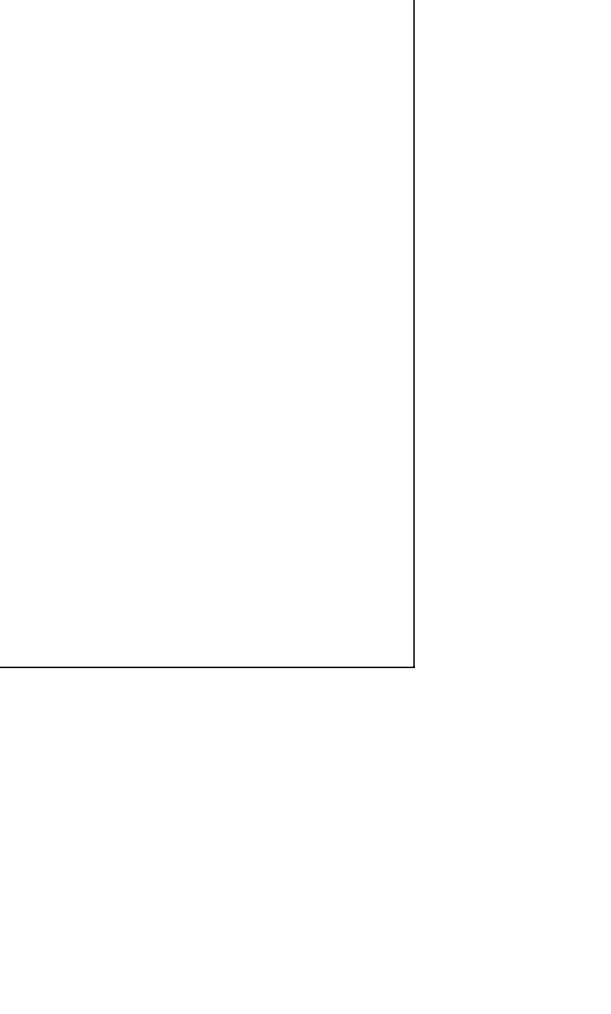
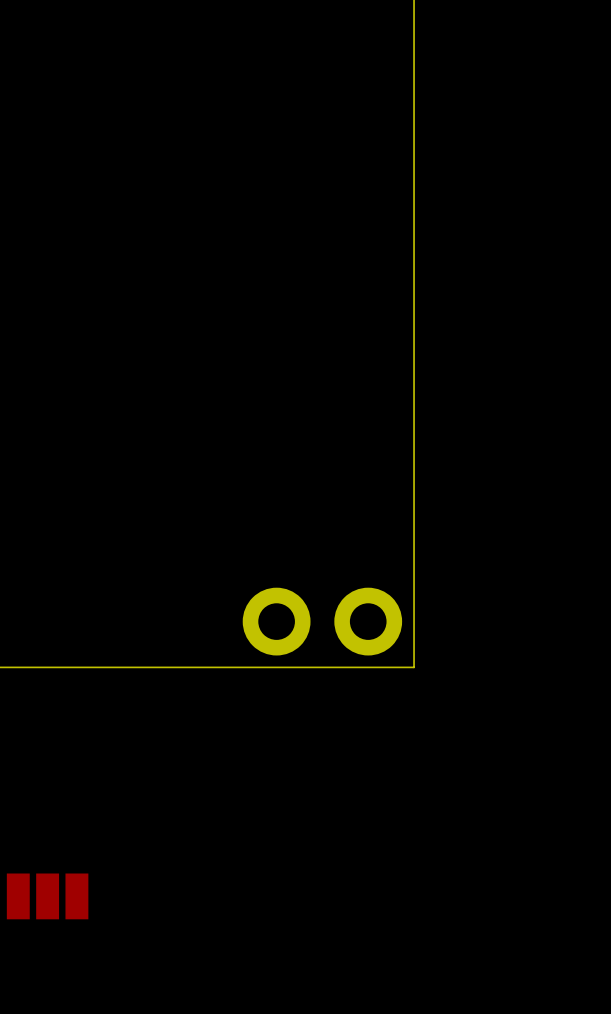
part: none -> (322, 621)
part: none -> (47, 896)

